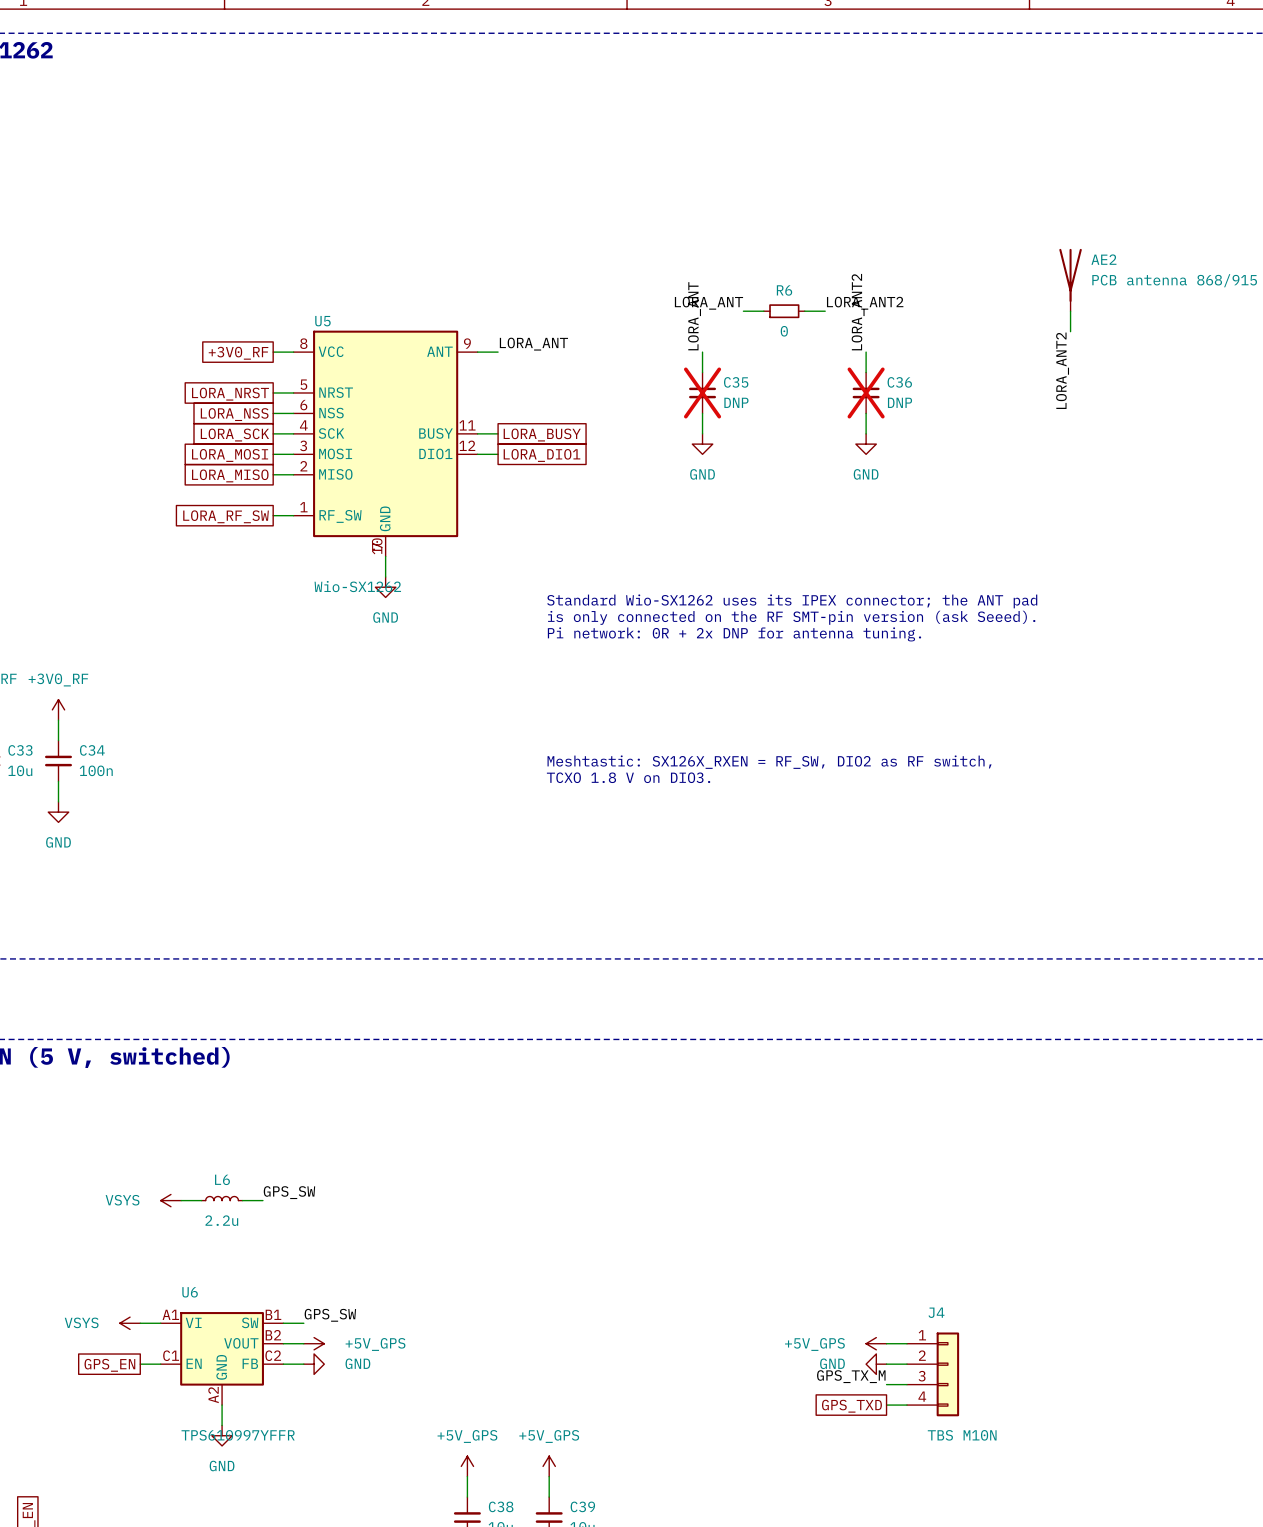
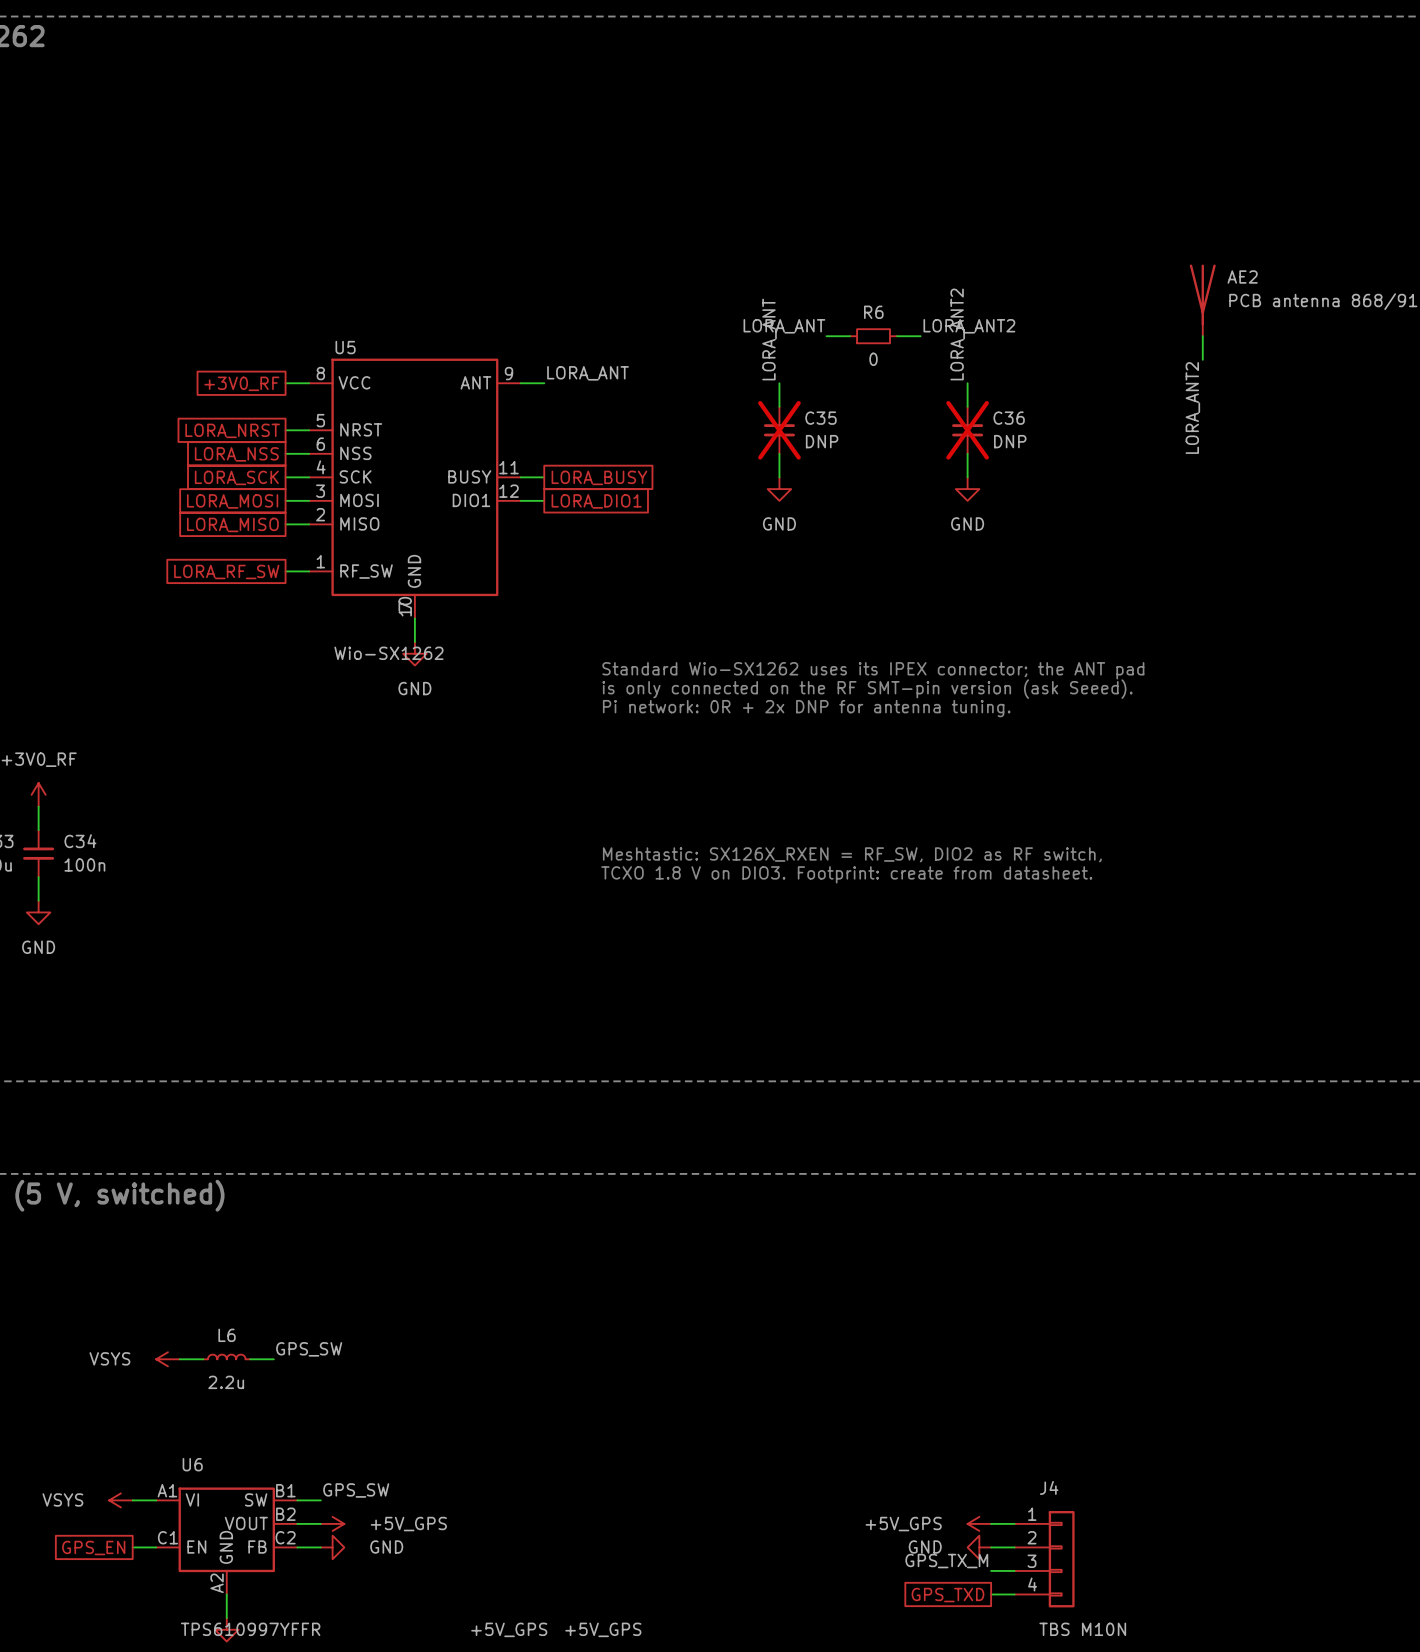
text: TCXO 1.8 V on DIO3. (628, 777) -> TCXO 1.8 V on DIO3. Footprint: create from datasheet. (846, 874)

